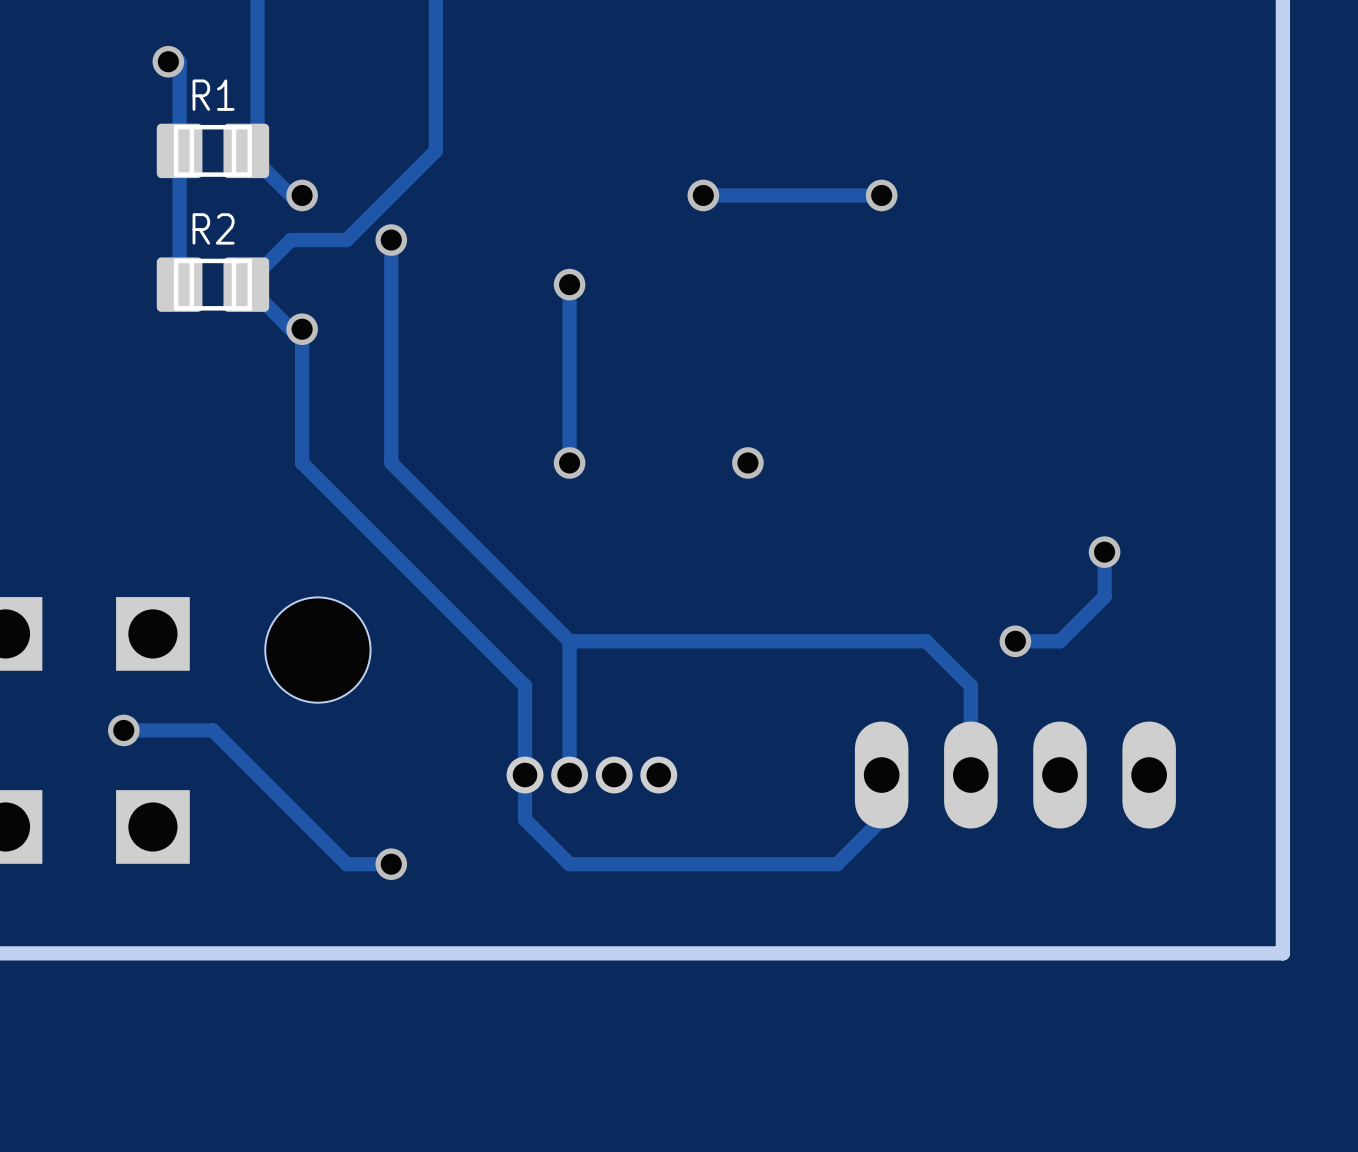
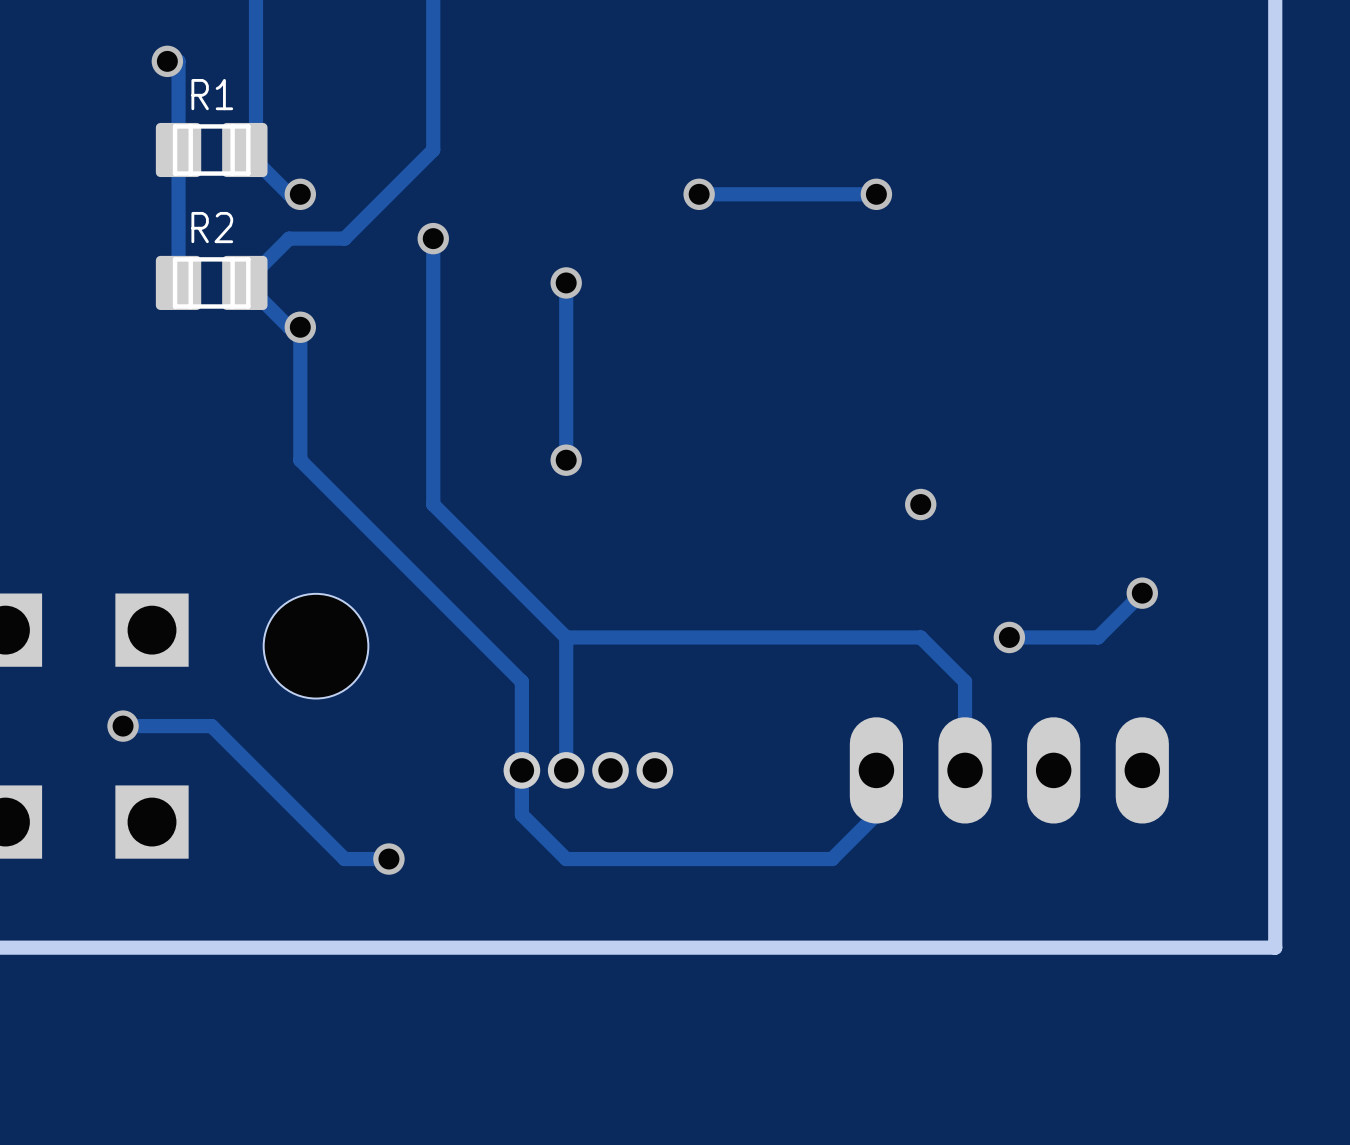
track: (391, 240) (391, 462) (435, 507) -> (433, 238) (433, 504)
via position: (391, 240) -> (433, 238)
via: (747, 462) -> none
via: none -> (920, 504)
track: (1104, 552) (1104, 596) (1059, 641) -> (1142, 593) (1097, 637) (1053, 637)
via position: (1104, 552) -> (1142, 593)

